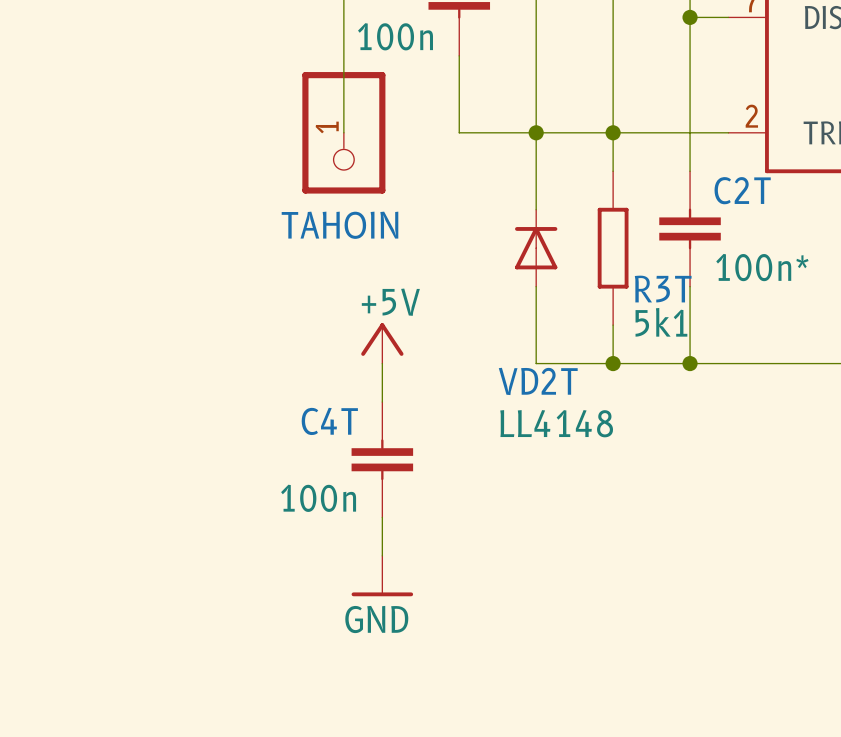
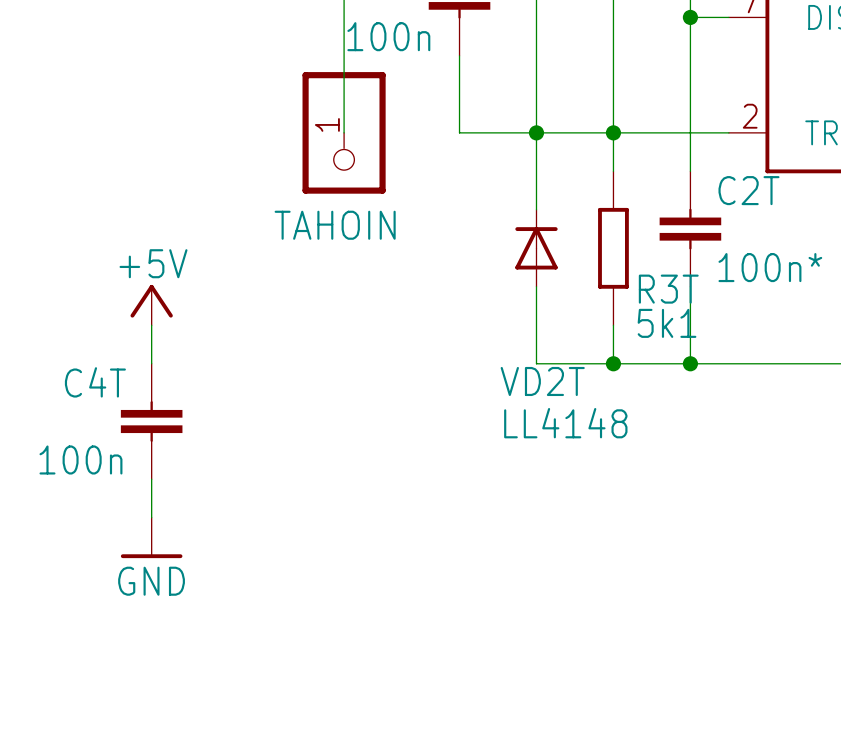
power symbol position: +5V (382, 343) -> +5V (151, 305)
wire: (382, 363) (382, 402) -> (151, 325) (151, 363)
C4T position: (382, 459) -> (151, 421)
wire: (382, 517) (382, 555) -> (151, 479) (151, 517)
power symbol position: GND (382, 576) -> GND (151, 537)

